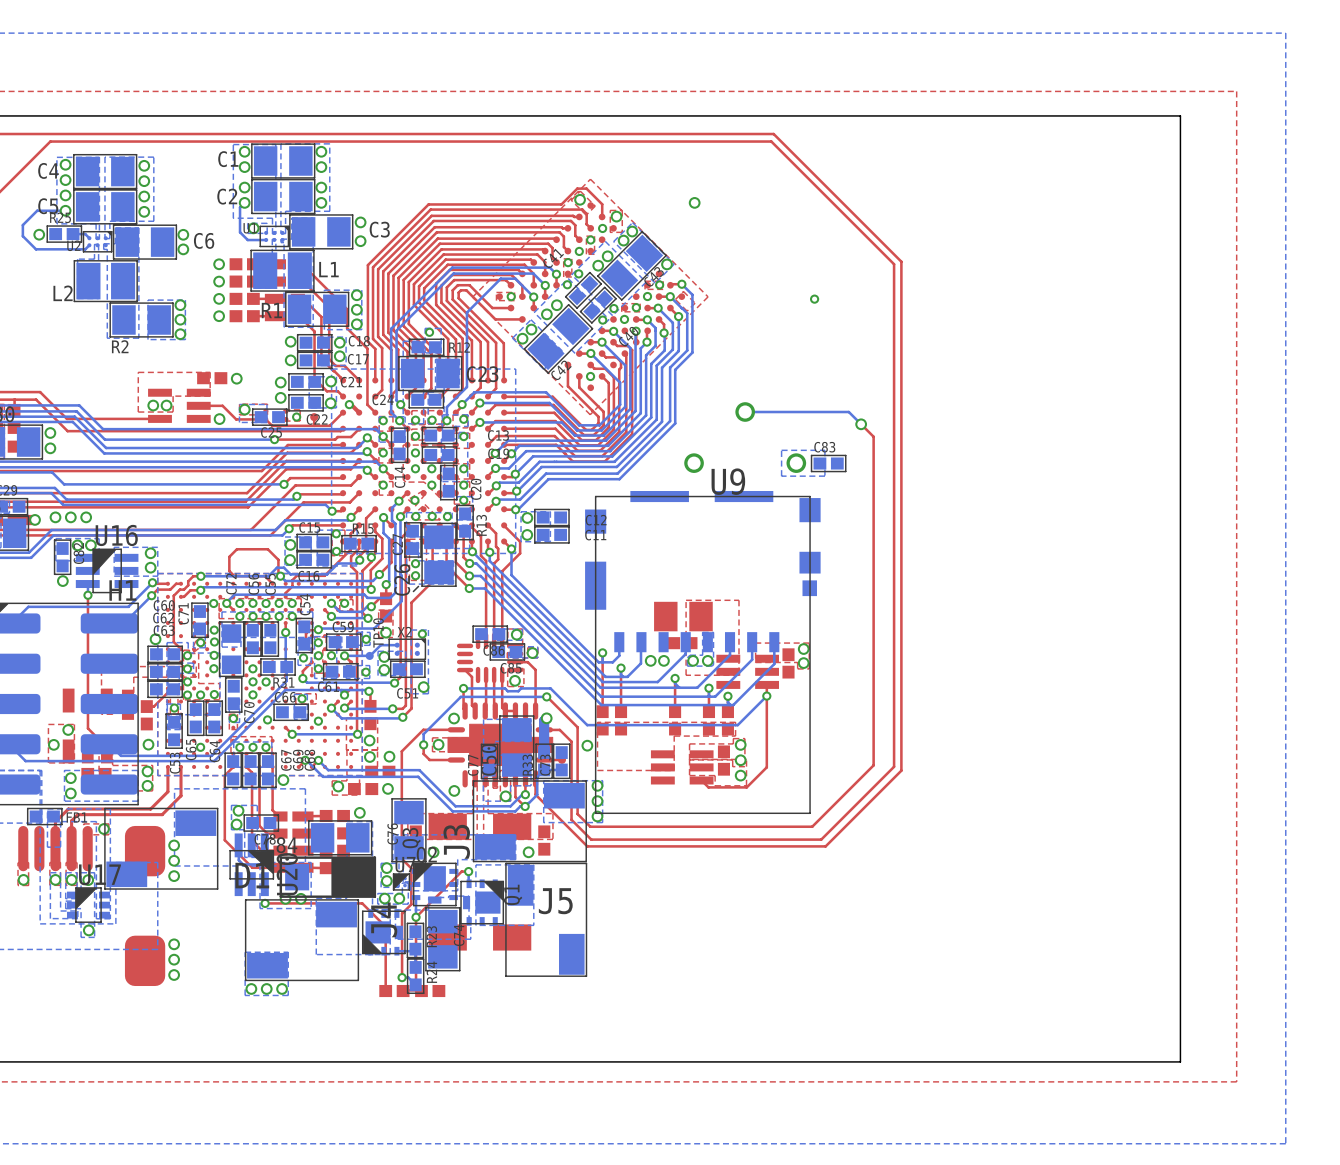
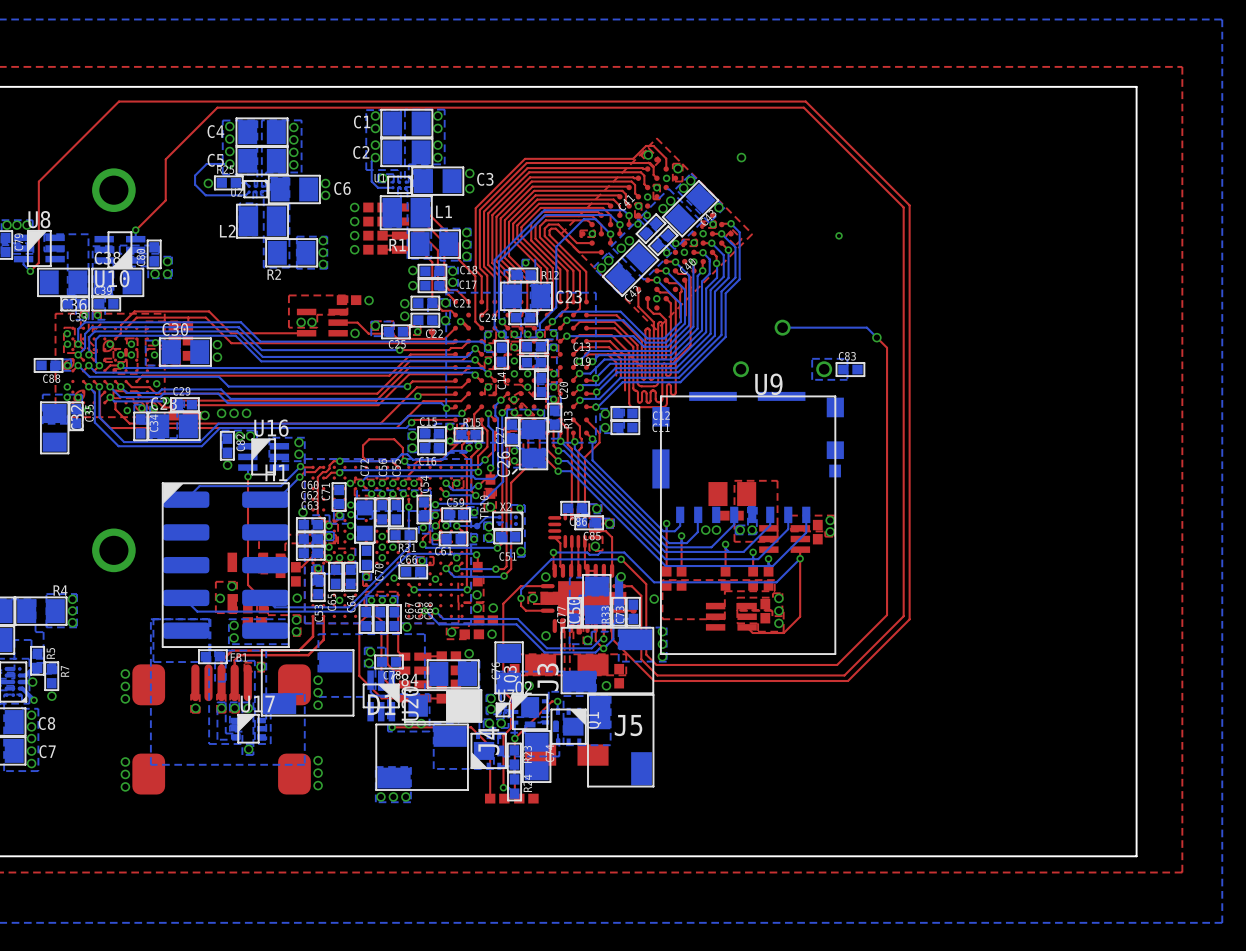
top track: (579, 376) (579, 387) (603, 411) (603, 425) (594, 435) (583, 435) (553, 404) (538, 404) -> (647, 298) (647, 308) (653, 313) (659, 313) (666, 320) (666, 357) (664, 359) (662, 357) (662, 323) (660, 321) (658, 324) (658, 382) (656, 385) (641, 386) (638, 384) (637, 345) (614, 321)
top track: (607, 382) (608, 427) (596, 440) (581, 440) (554, 412) (538, 412) -> (670, 303) (670, 373) (666, 375) (666, 364) (663, 363) (662, 399) (660, 402) (656, 400) (655, 392) (653, 390) (650, 392) (649, 402) (646, 402) (646, 392) (644, 391) (642, 392) (641, 401) (638, 401) (637, 392) (633, 388) (633, 346) (614, 328)
top track: (541, 396) (552, 396) (585, 429) (591, 429) (598, 423) (598, 416) (586, 405) -> (616, 315) (641, 340) (641, 377) (643, 379) (645, 378) (645, 330) (646, 328) (649, 330) (649, 378) (651, 379) (653, 377) (653, 322)
top track: (626, 397) (626, 432) (602, 456) (574, 456) (554, 436) (531, 436) -> (620, 378) (620, 359) (608, 347)
top track: (619, 399) (619, 431) (600, 450) (577, 450) (555, 428) (533, 428) -> (625, 390) (625, 356) (610, 341)
top track: (534, 421) (555, 421) (579, 445) (598, 445) (613, 429) -> (611, 335) (629, 352) (629, 403) (632, 407) (664, 406) (666, 403) (668, 384) (670, 385) (671, 394) (675, 393) (675, 341)
top track: none -> (607, 354) (616, 362) (616, 375)

